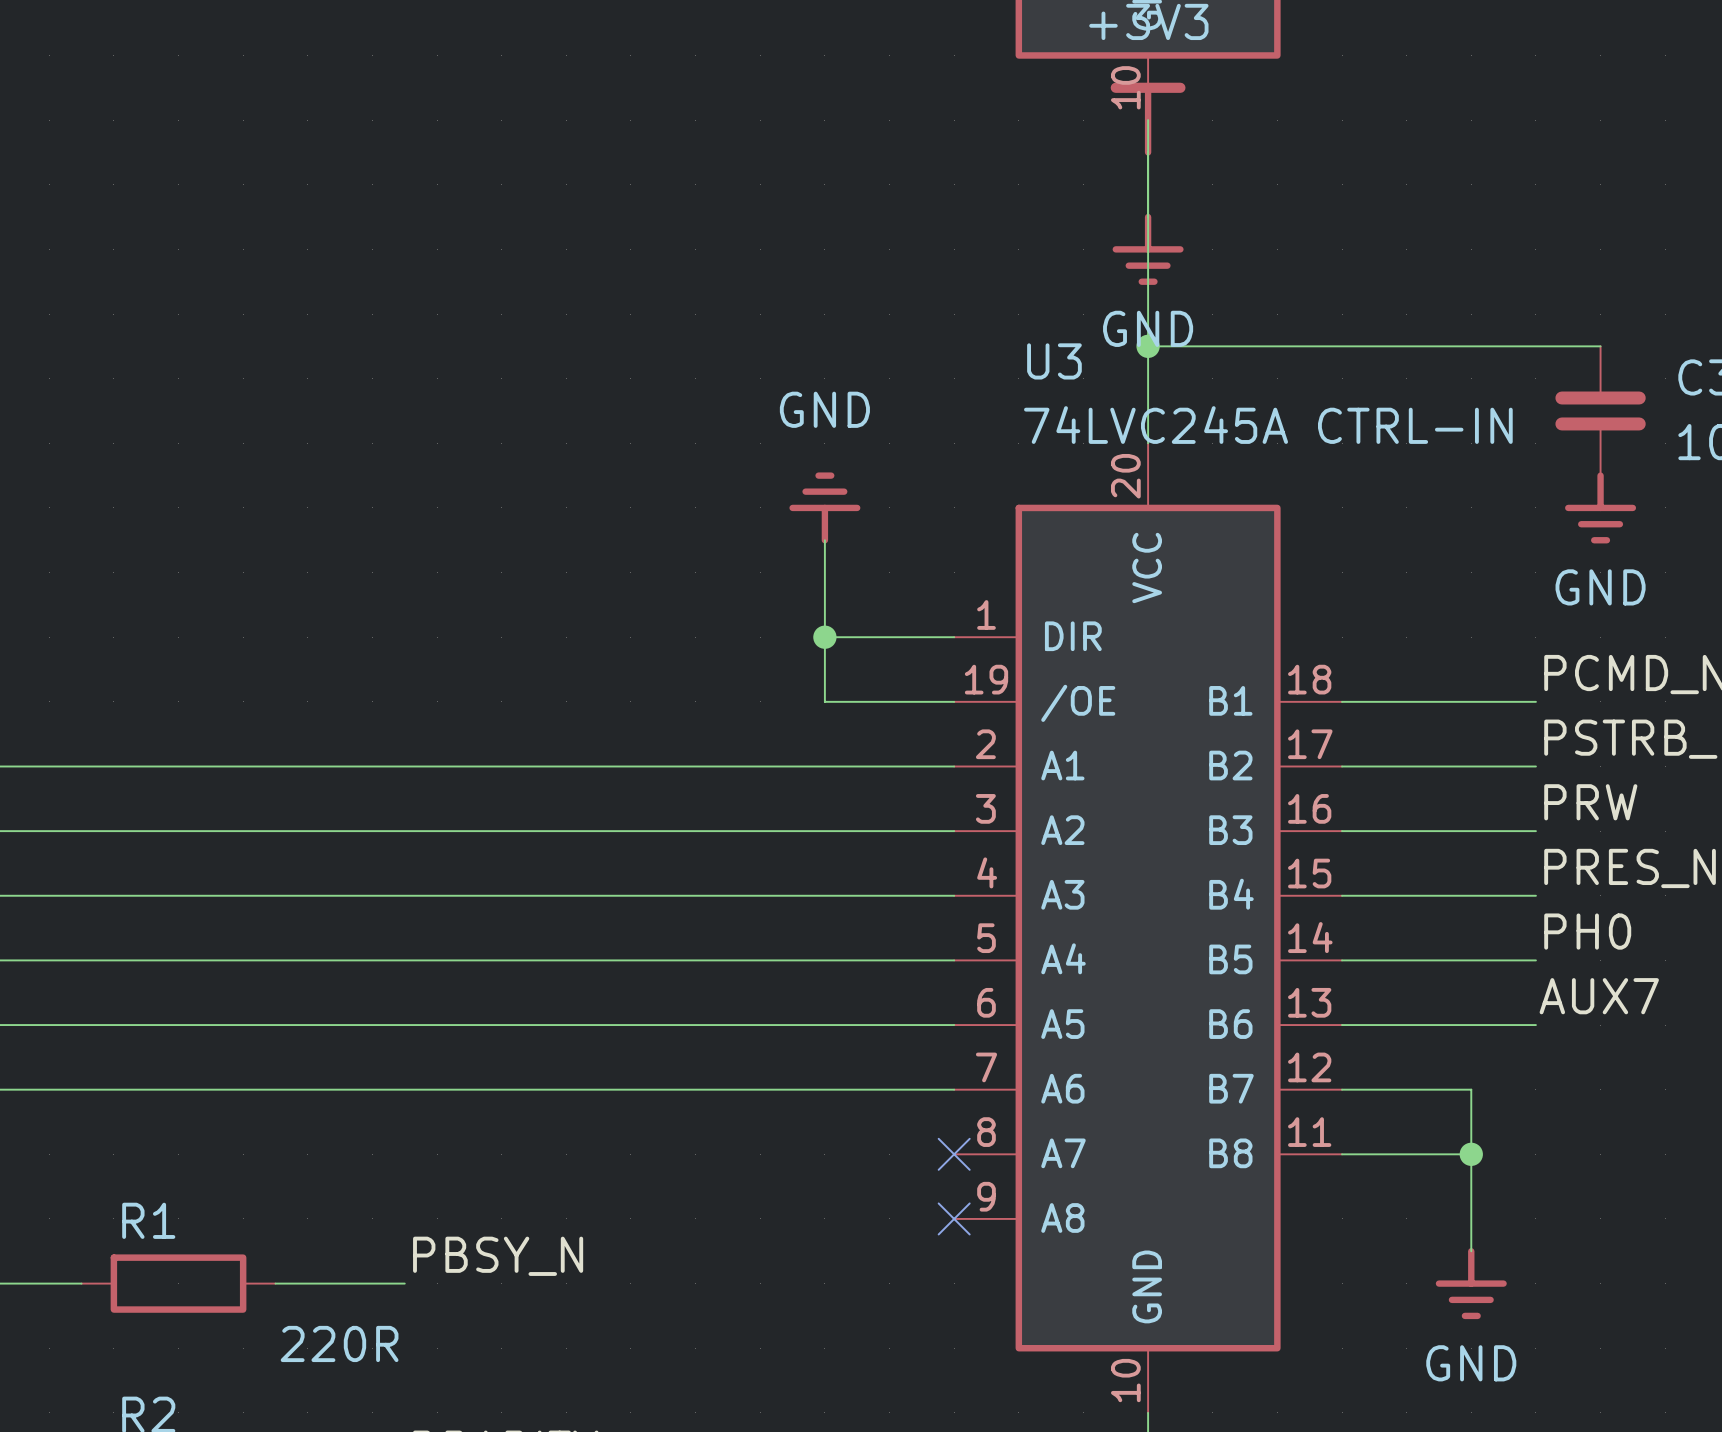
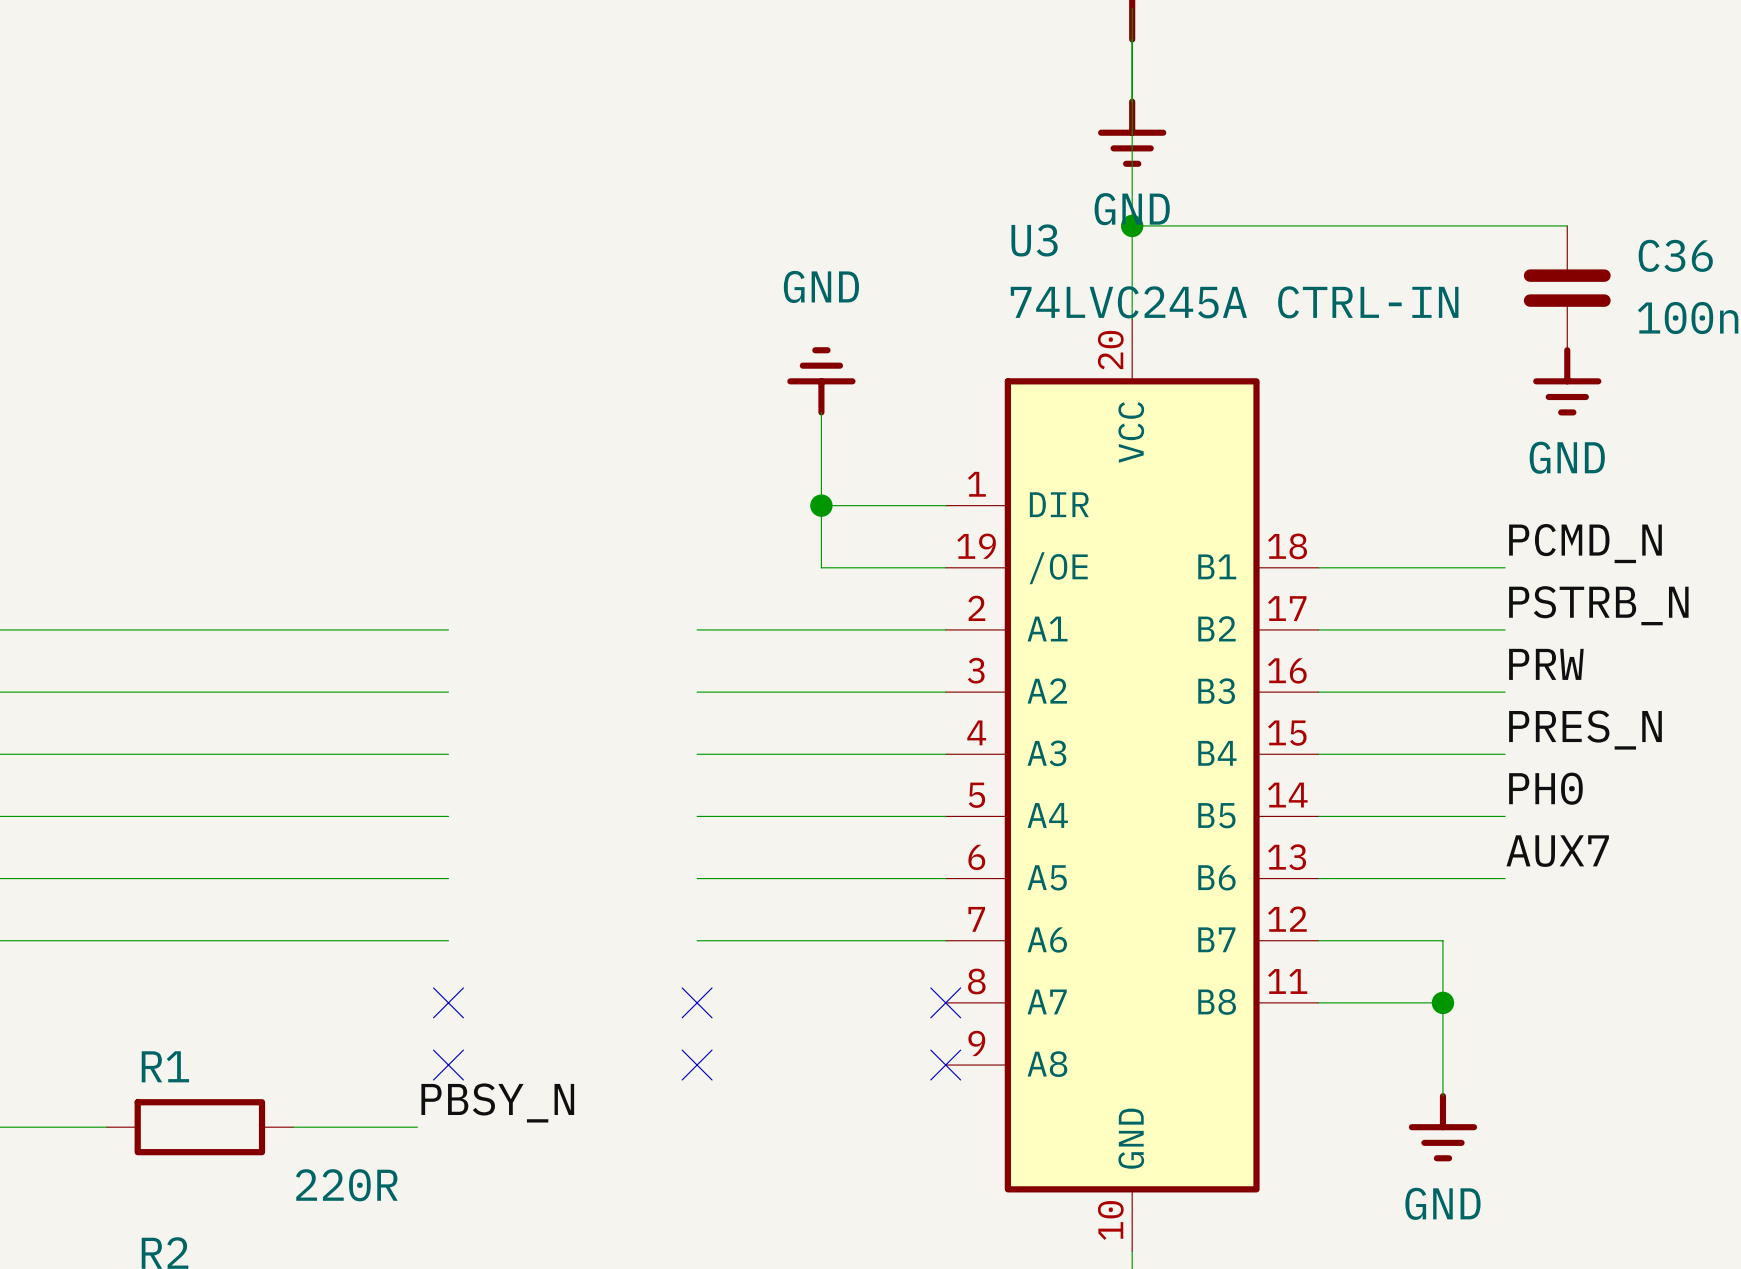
wire: (437, 766) (695, 766) -> none
wire: (437, 831) (695, 831) -> none
wire: (437, 895) (695, 895) -> none
wire: (437, 960) (695, 960) -> none
wire: (437, 1025) (695, 1025) -> none
wire: (437, 1089) (695, 1089) -> none
no-connect mark: none -> (448, 1002)
no-connect mark: none -> (697, 1002)
no-connect mark: none -> (448, 1065)
no-connect mark: none -> (697, 1065)

